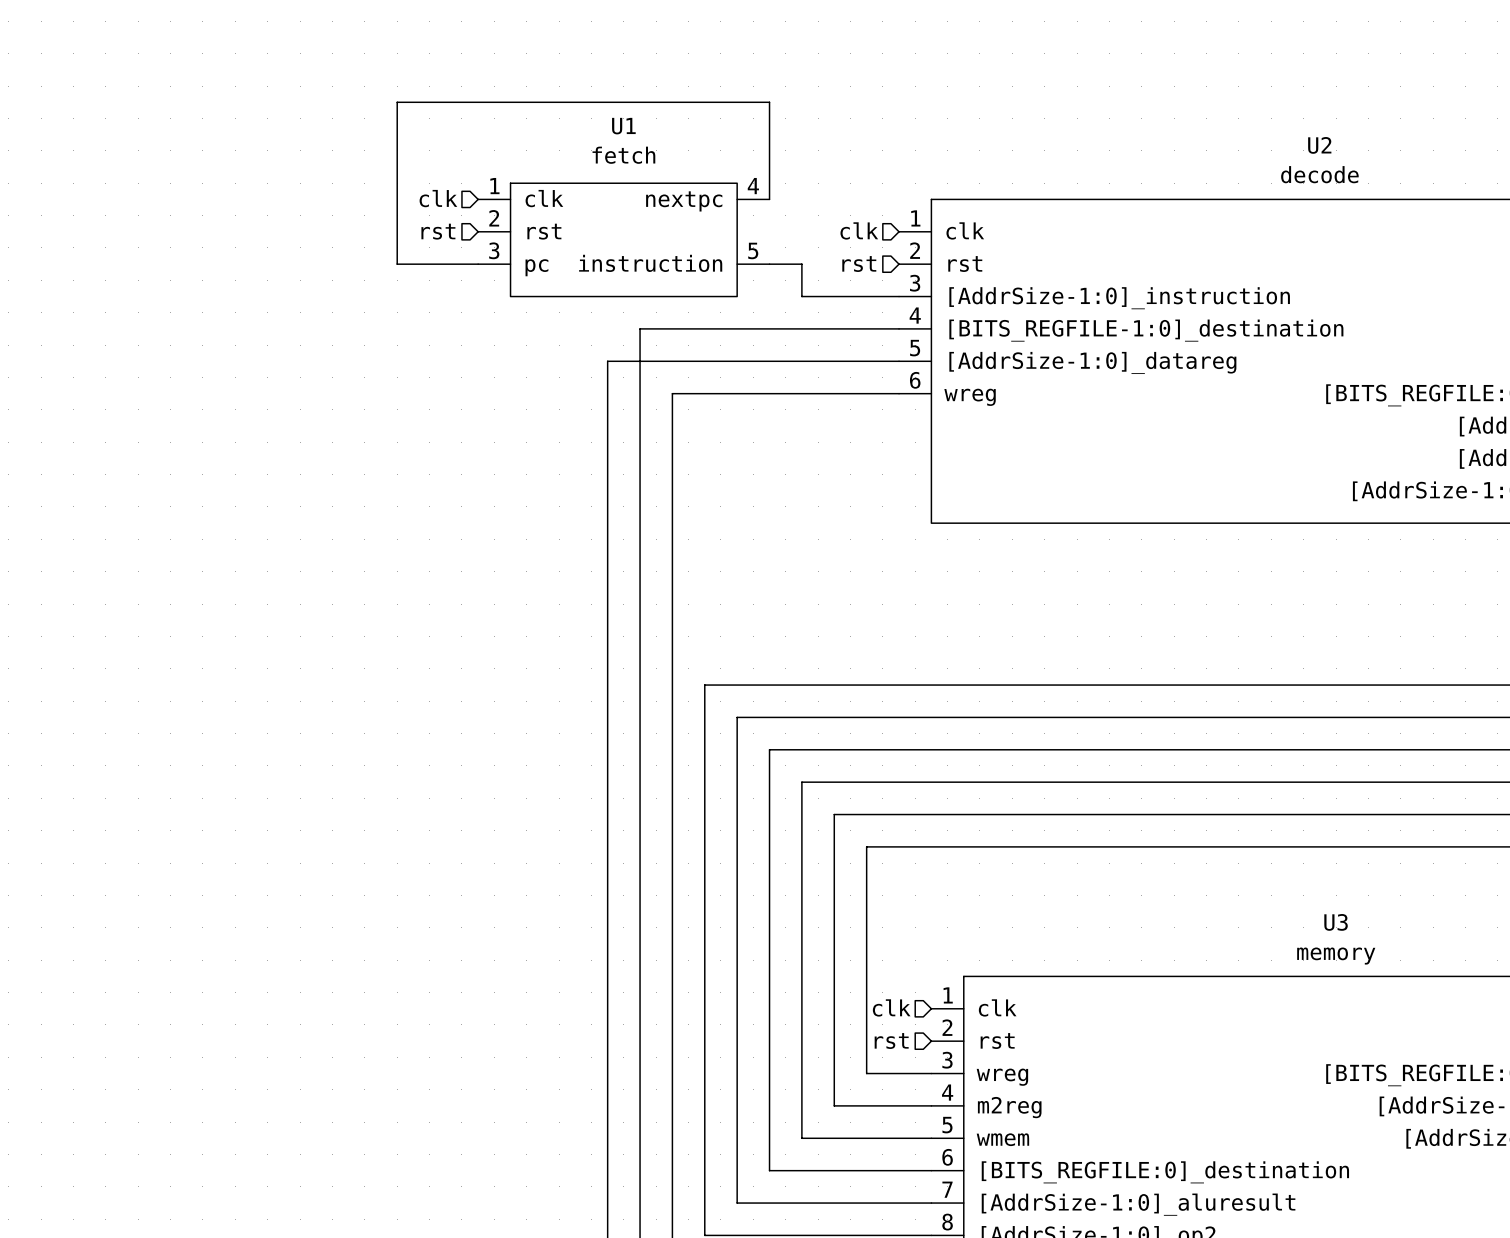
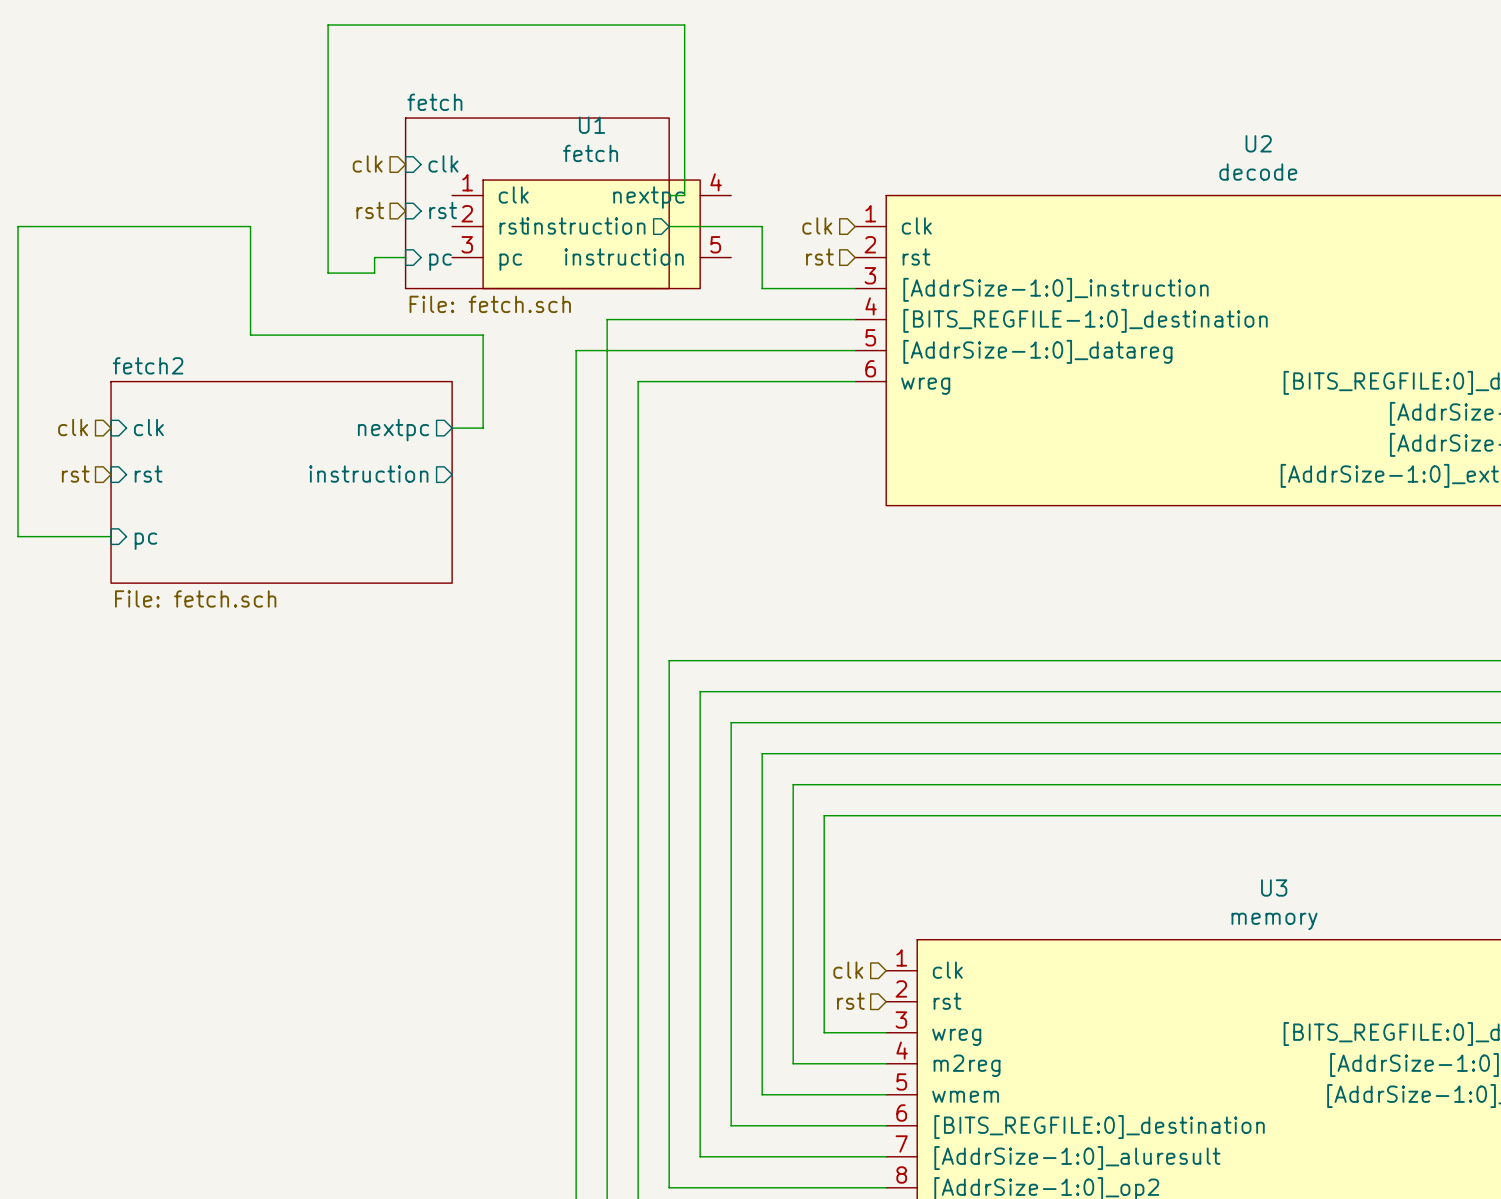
sheet pin: none -> clk (443, 163)
hierarchical label position: clk (438, 198) -> clk (367, 163)
wire: (769, 199) (769, 102) (397, 102) (397, 264) -> (669, 195) (684, 195) (684, 25) (328, 25) (328, 273) (374, 273) (374, 257)
sheet fetch: none -> File: fetch.sch (537, 203)
sheet pin: none -> rst (443, 210)
hierarchical label position: rst (438, 231) -> rst (370, 210)
sheet pin: none -> instruction (585, 225)
wire: (429, 264) (478, 264) -> none
wire: (769, 264) (801, 264) -> (669, 226) (762, 226) (762, 257)
sheet pin: none -> pc (440, 262)
hierarchical label: none -> clk (73, 427)
sheet pin: none -> clk (148, 427)
wire: none -> (452, 428) (483, 428) (483, 335) (250, 335) (250, 226) (18, 226) (18, 536) (111, 536)
sheet pin: none -> nextpc (393, 430)
hierarchical label: none -> rst (75, 474)
sheet pin: none -> rst (148, 474)
sheet pin: none -> instruction (368, 474)
sheet fetch2: none -> File: fetch.sch (281, 482)
sheet pin: none -> pc (145, 541)

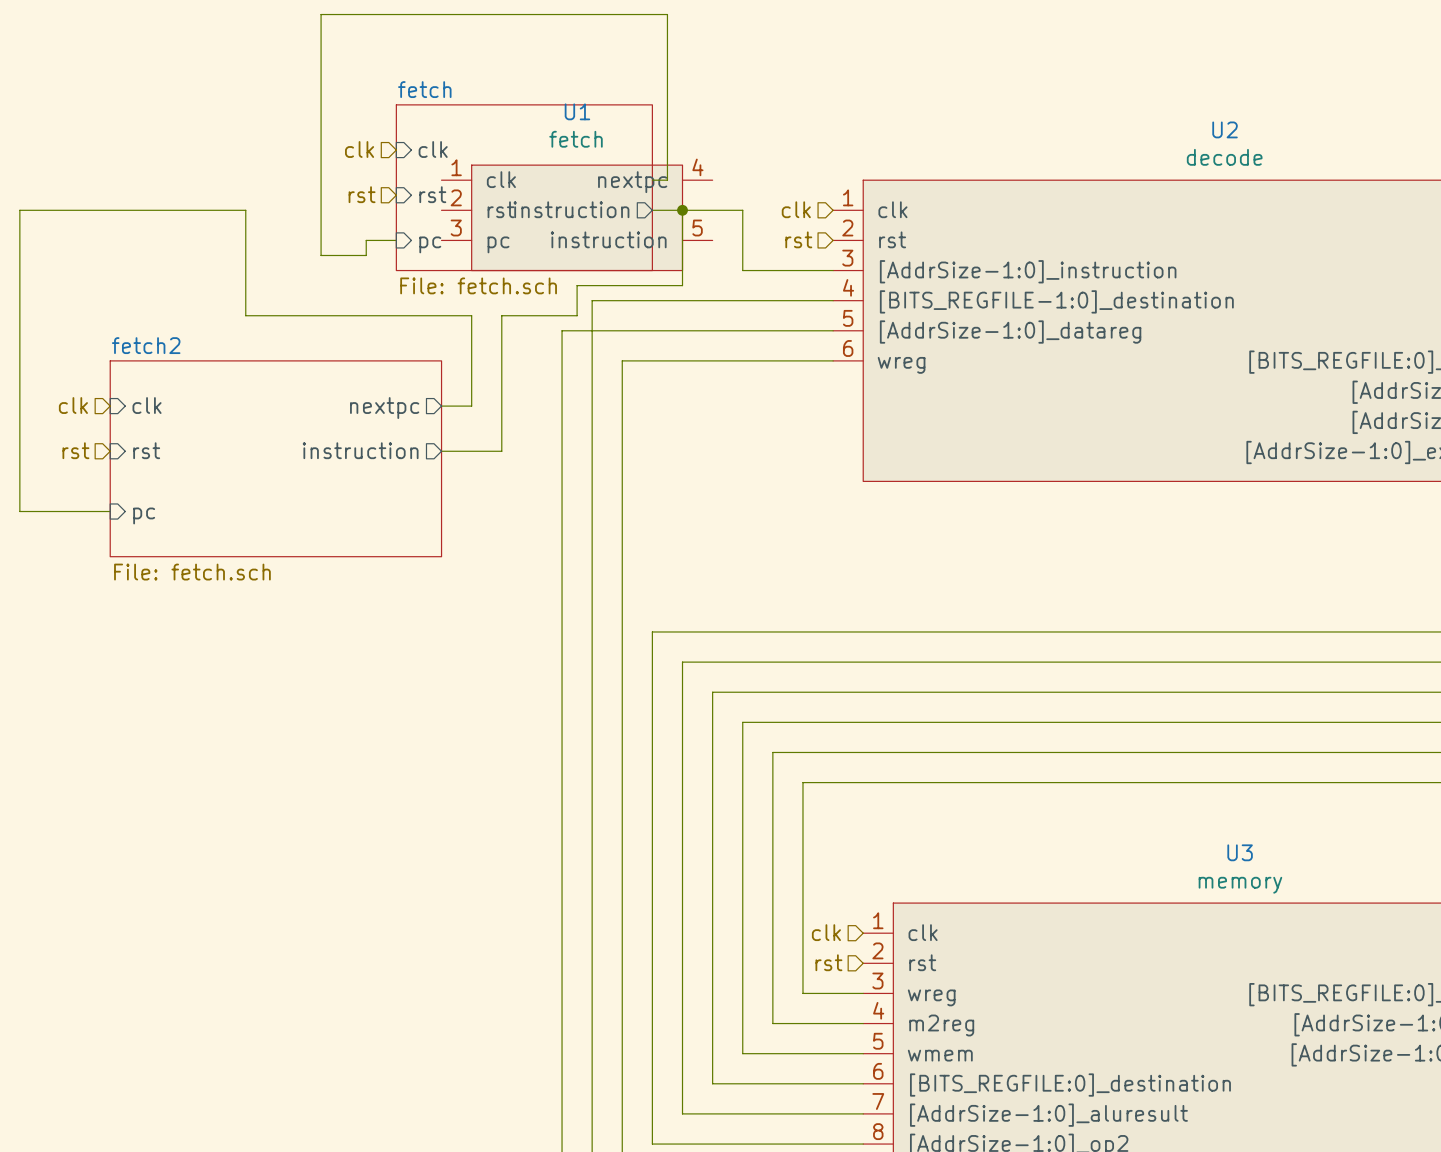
wire: none -> (682, 210) (682, 285) (577, 285) (577, 315) (501, 315) (501, 451) (441, 451)
junction: none -> (682, 210)

